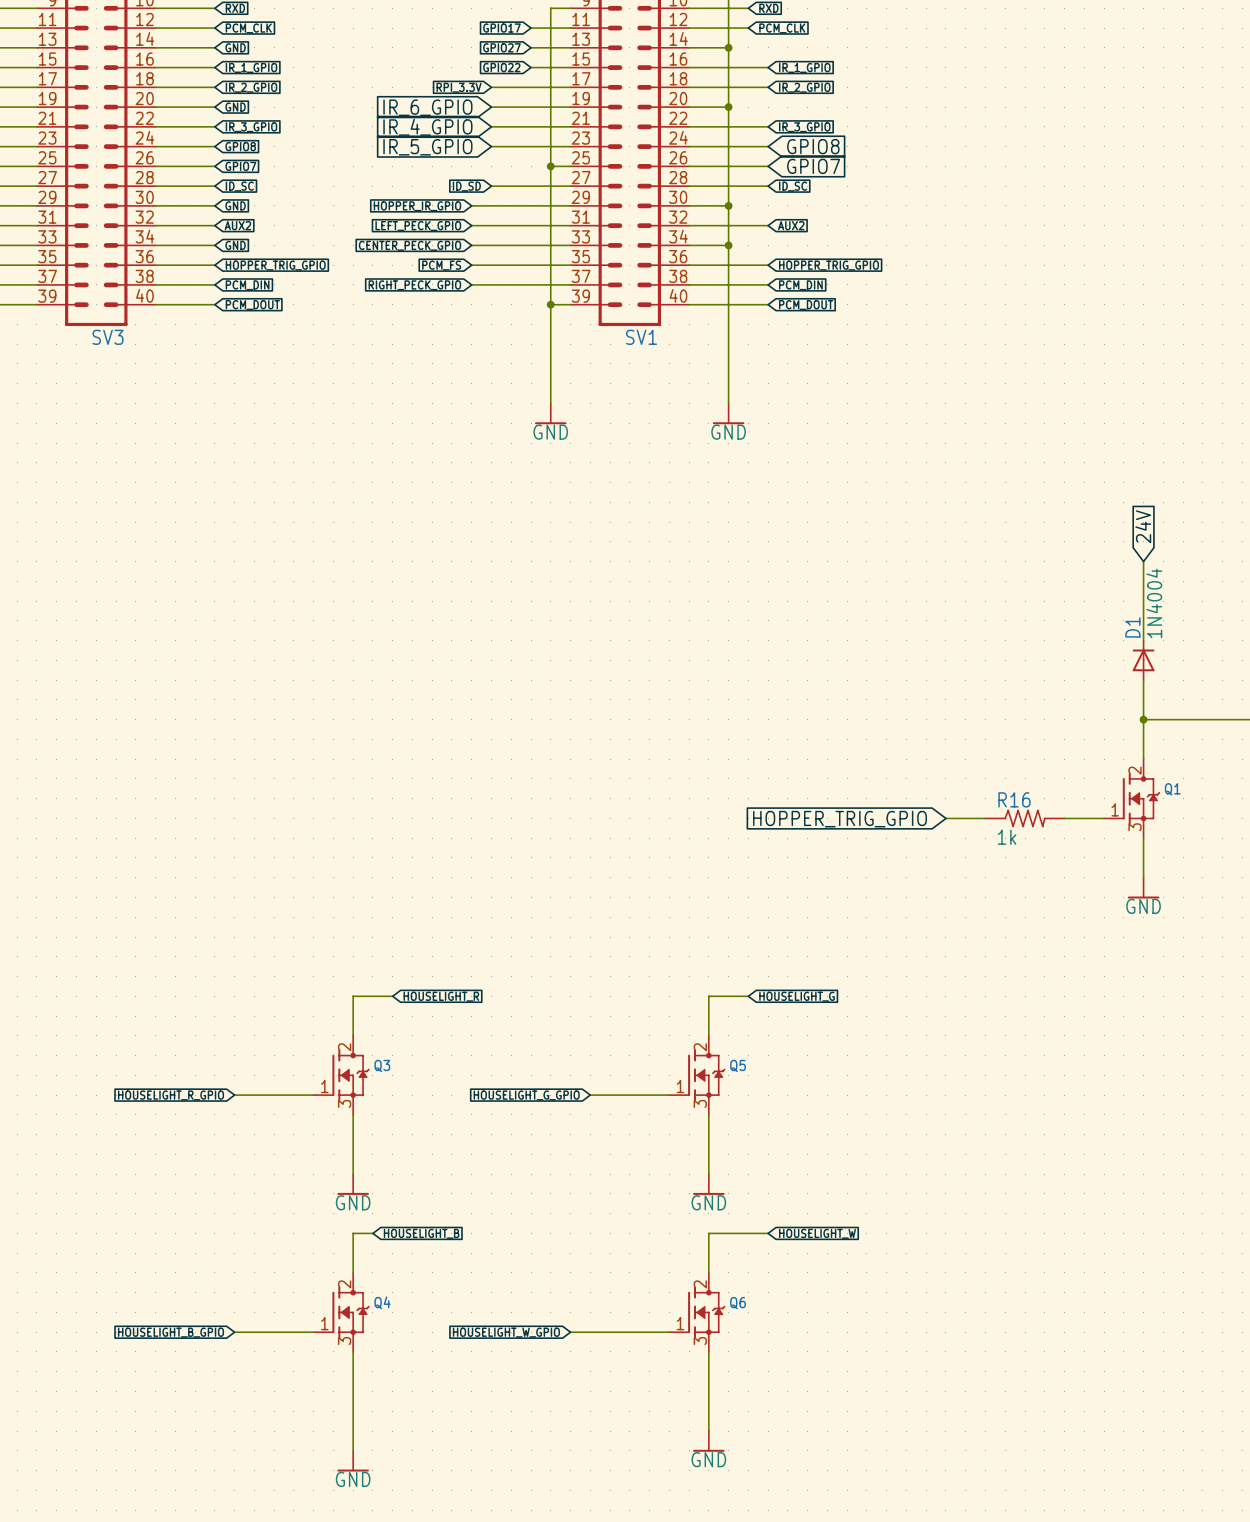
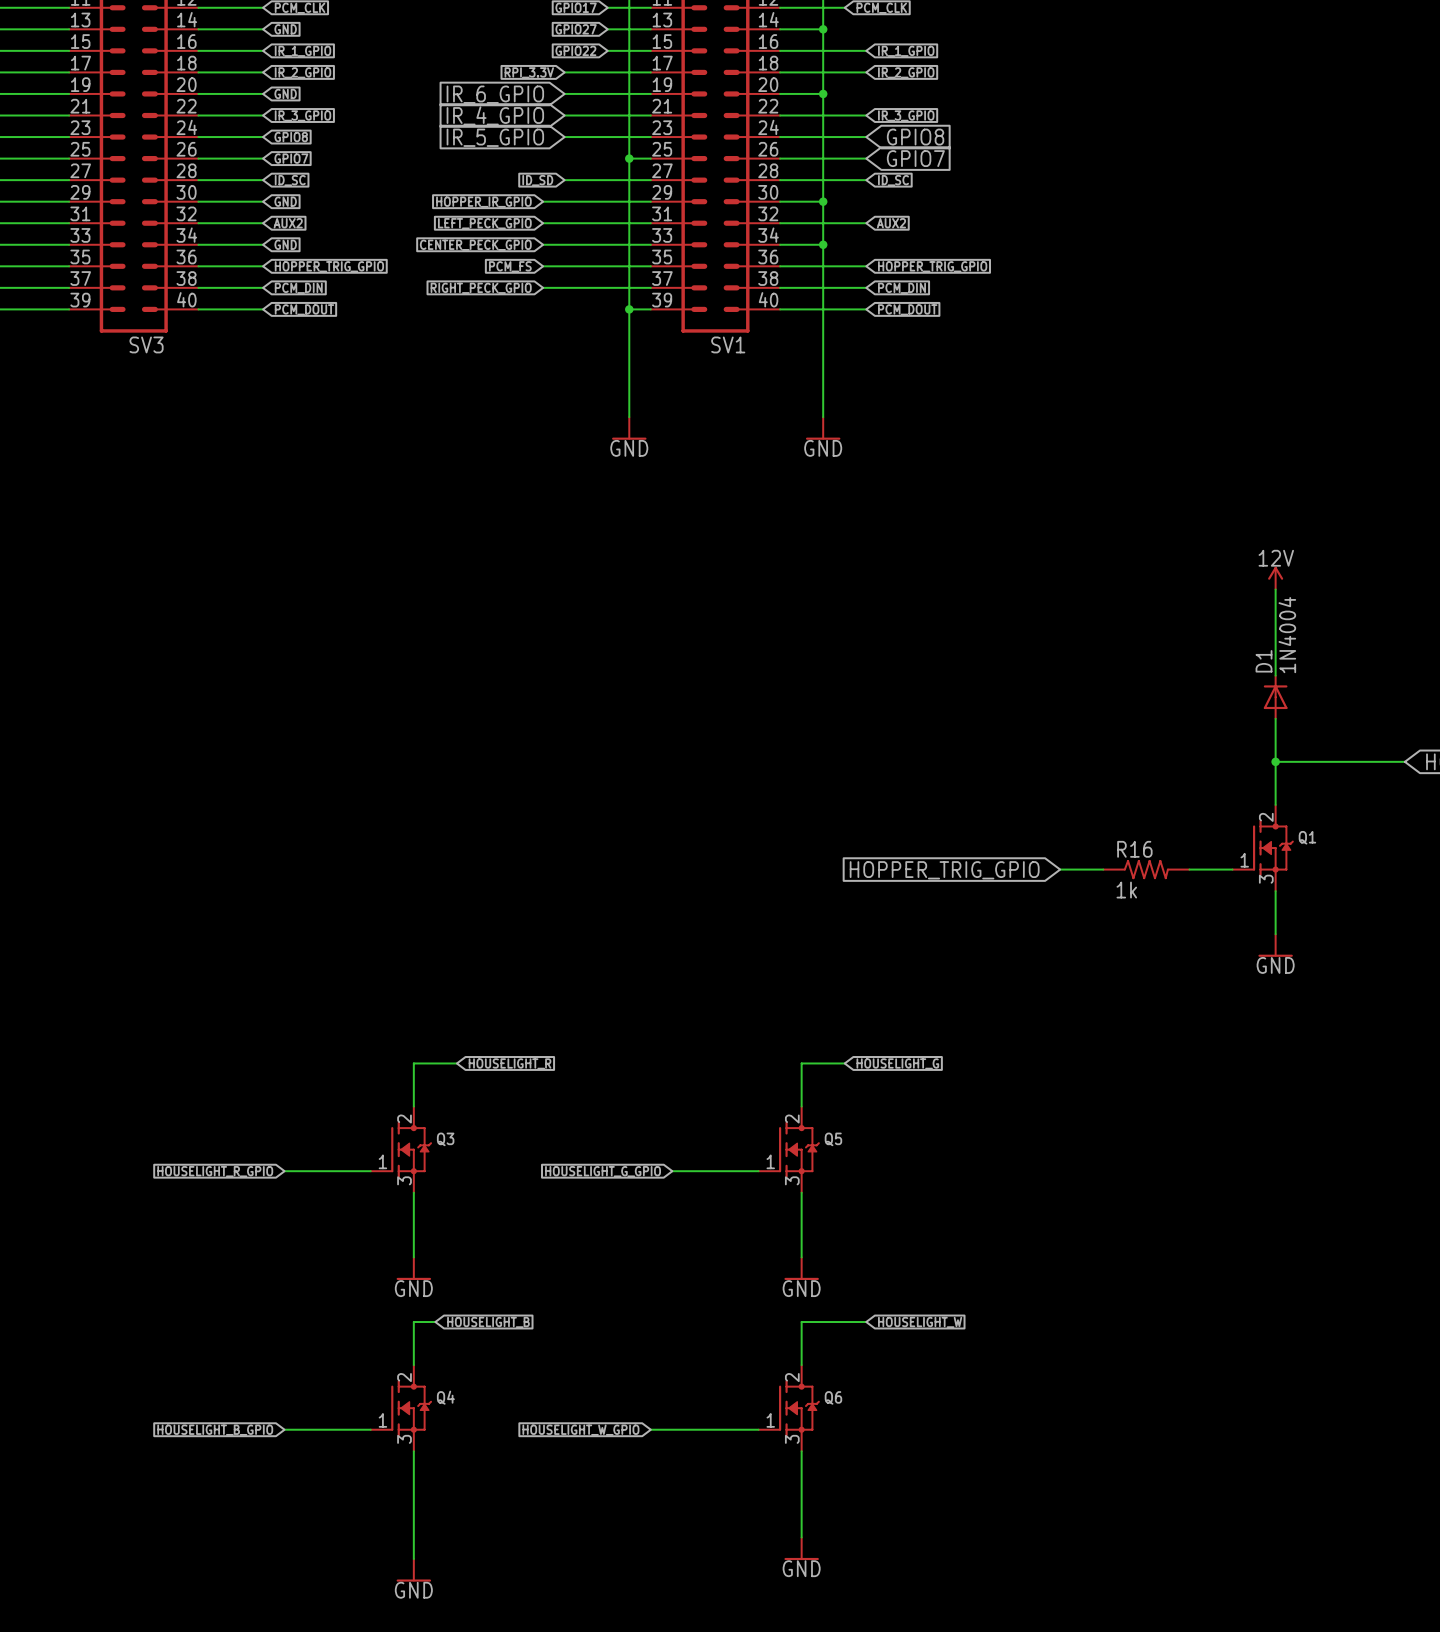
global label: 24V (1143, 526) -> none
power symbol: none -> 12V (1275, 578)

